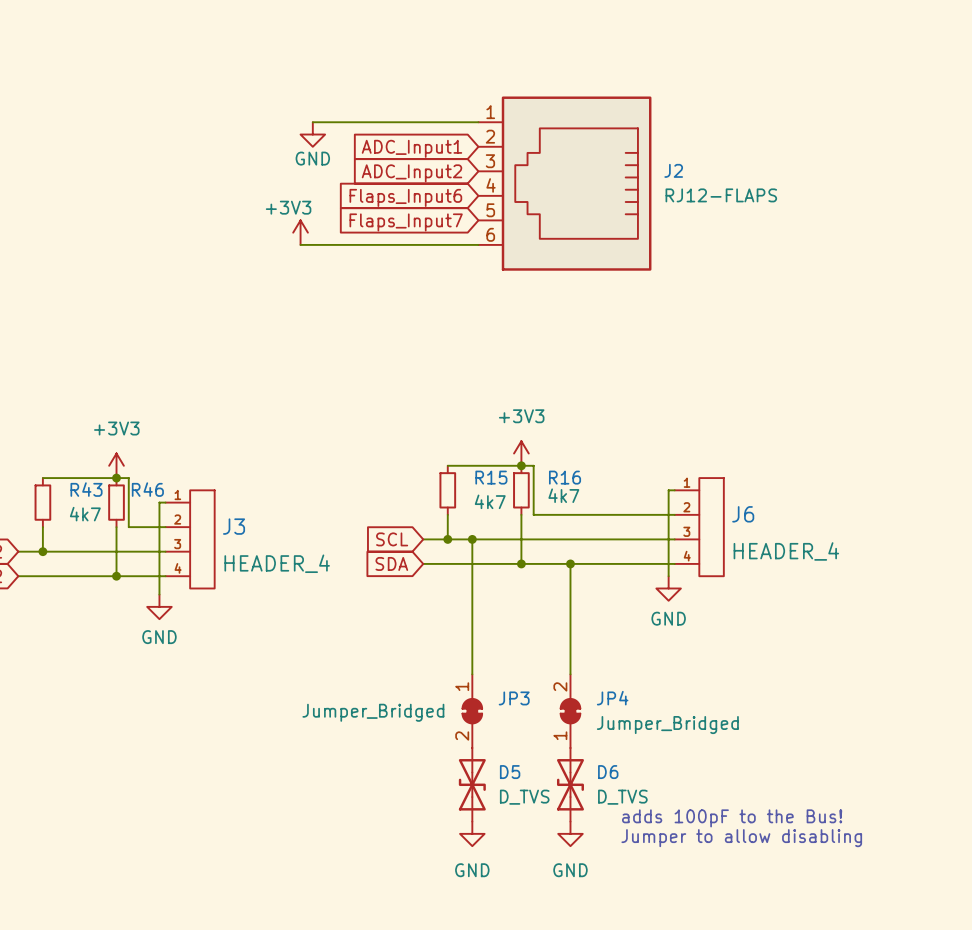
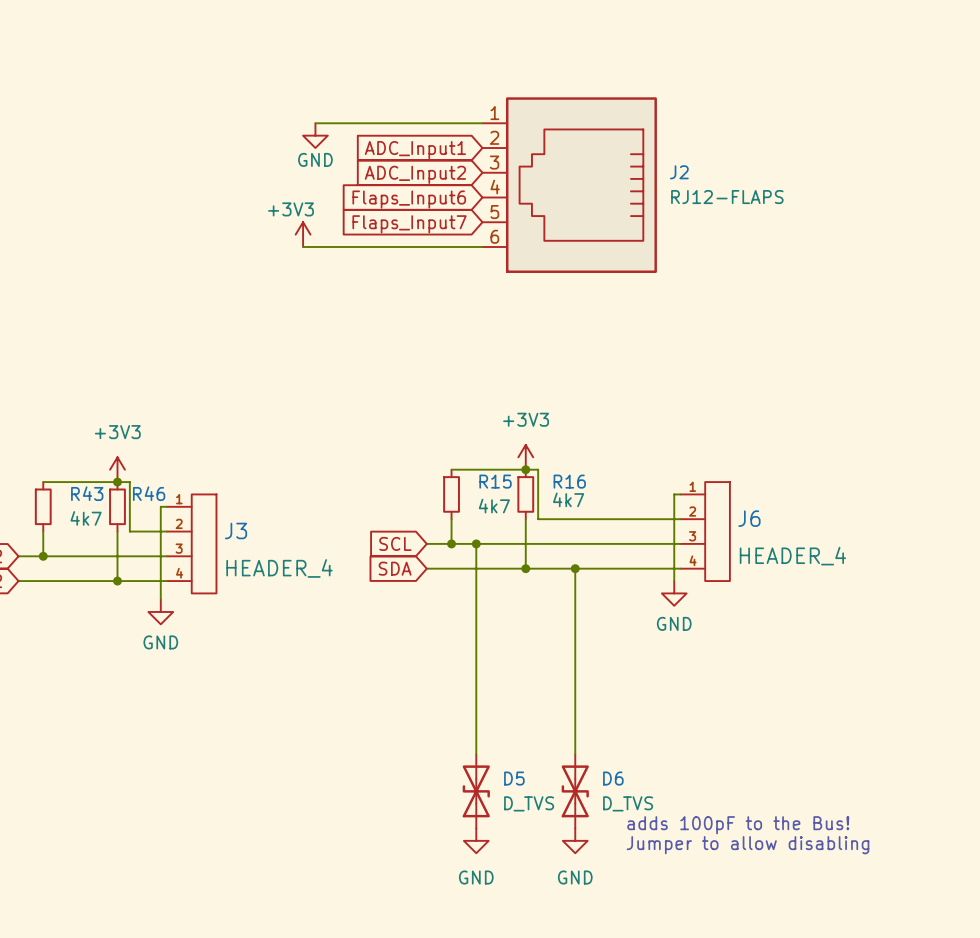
JP3: Jumper_Bridged (472, 711) -> none
JP4: Jumper_Bridged (570, 711) -> none

